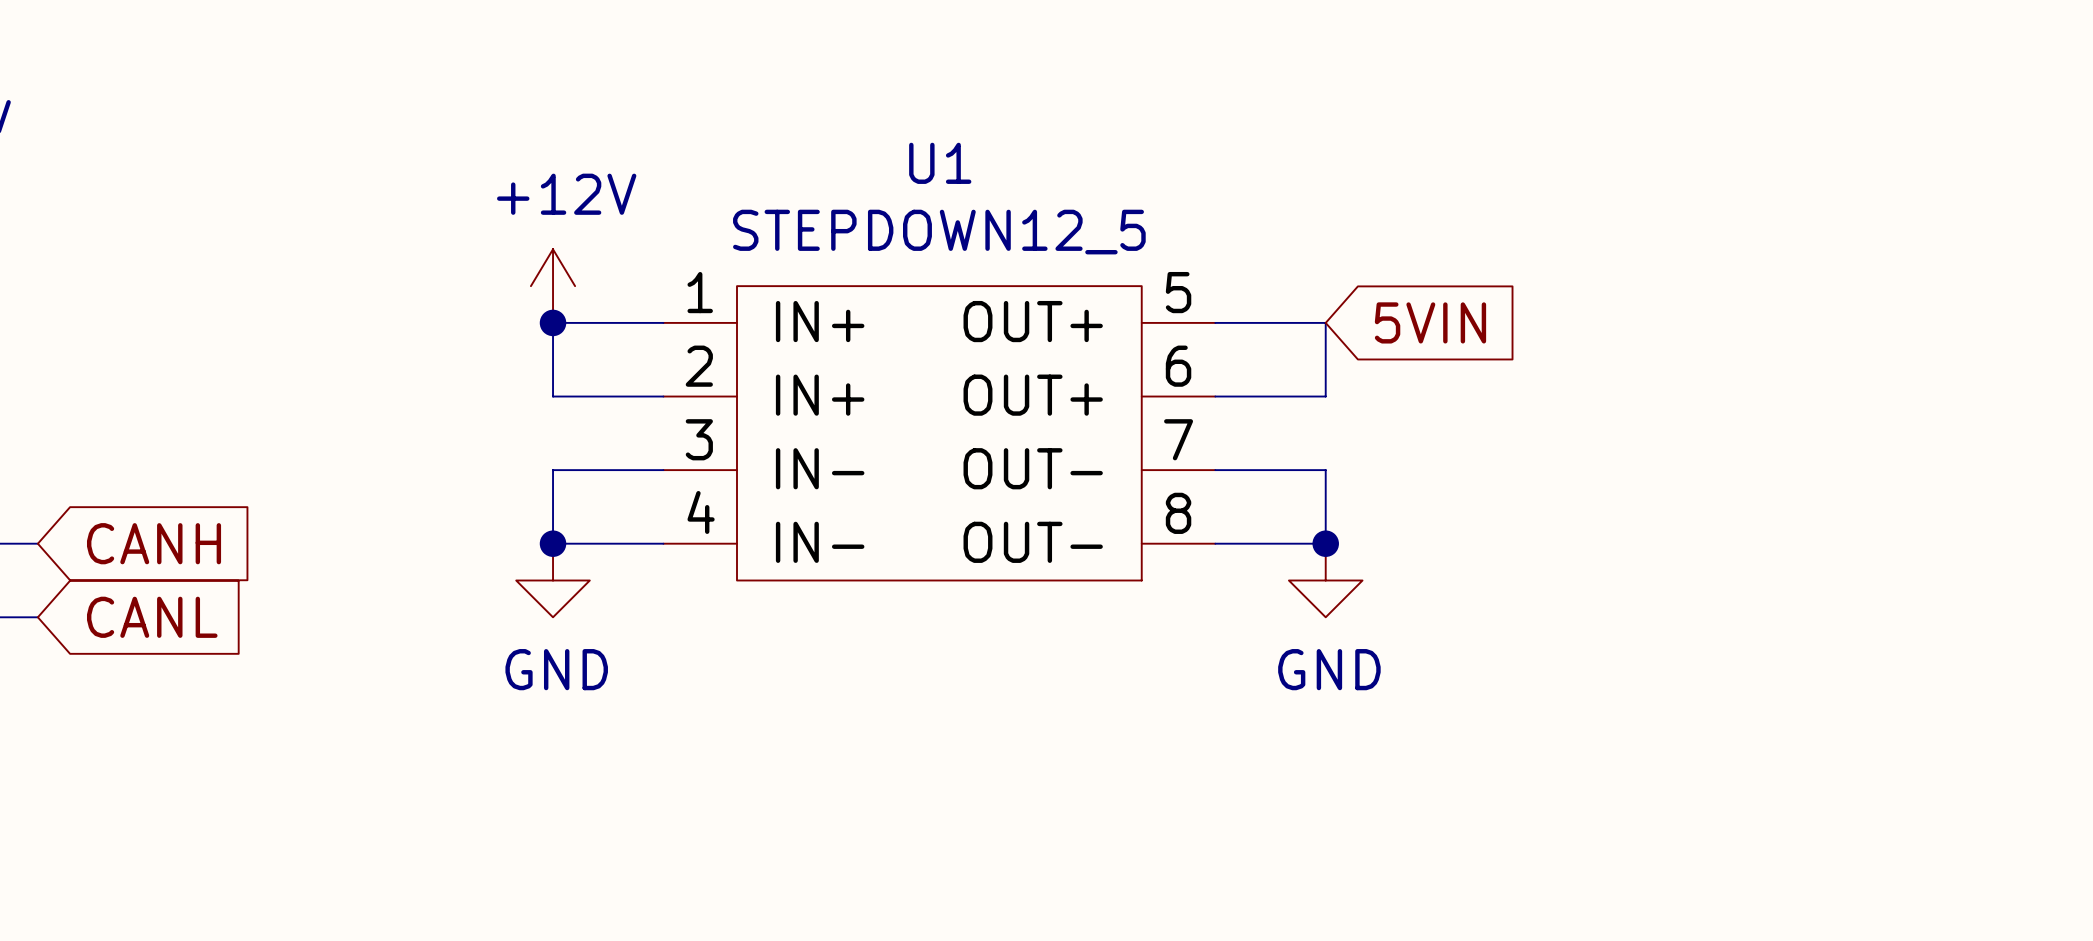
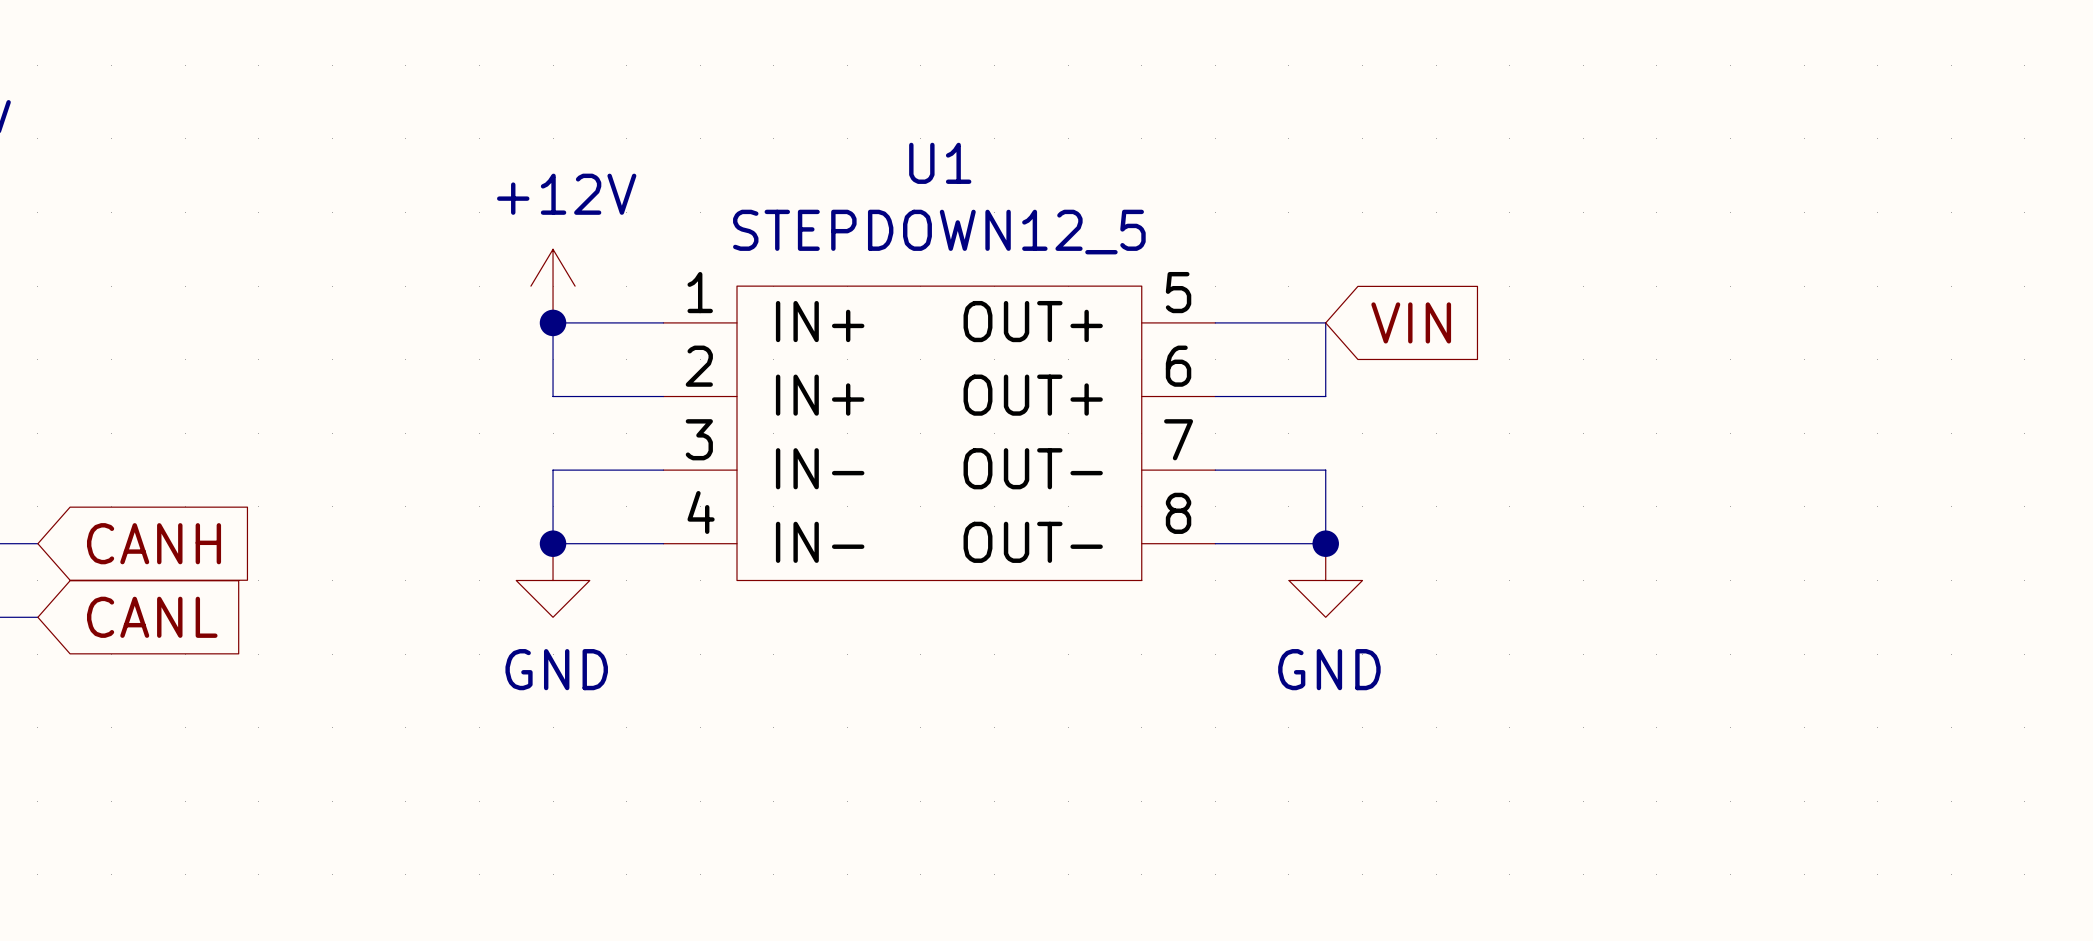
global label: 5VIN (1430, 322) -> VIN (1411, 322)

